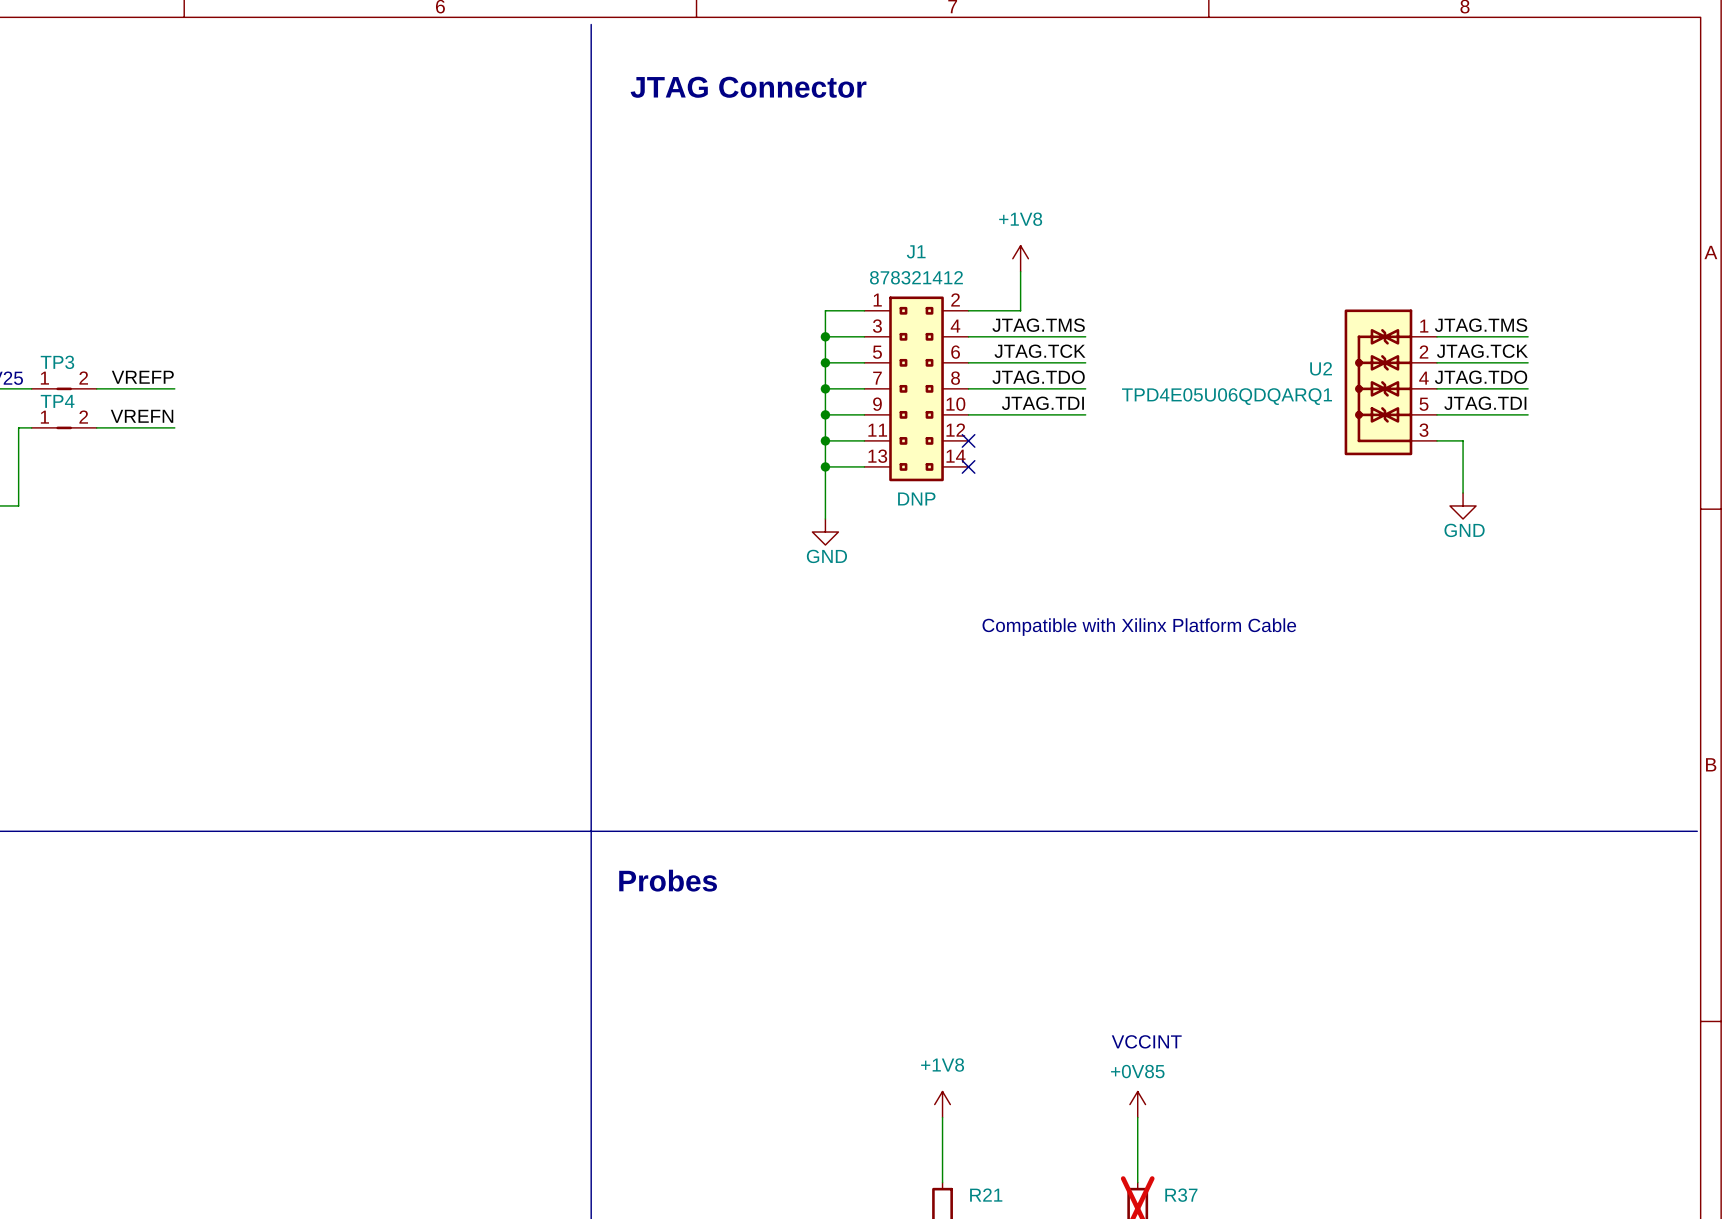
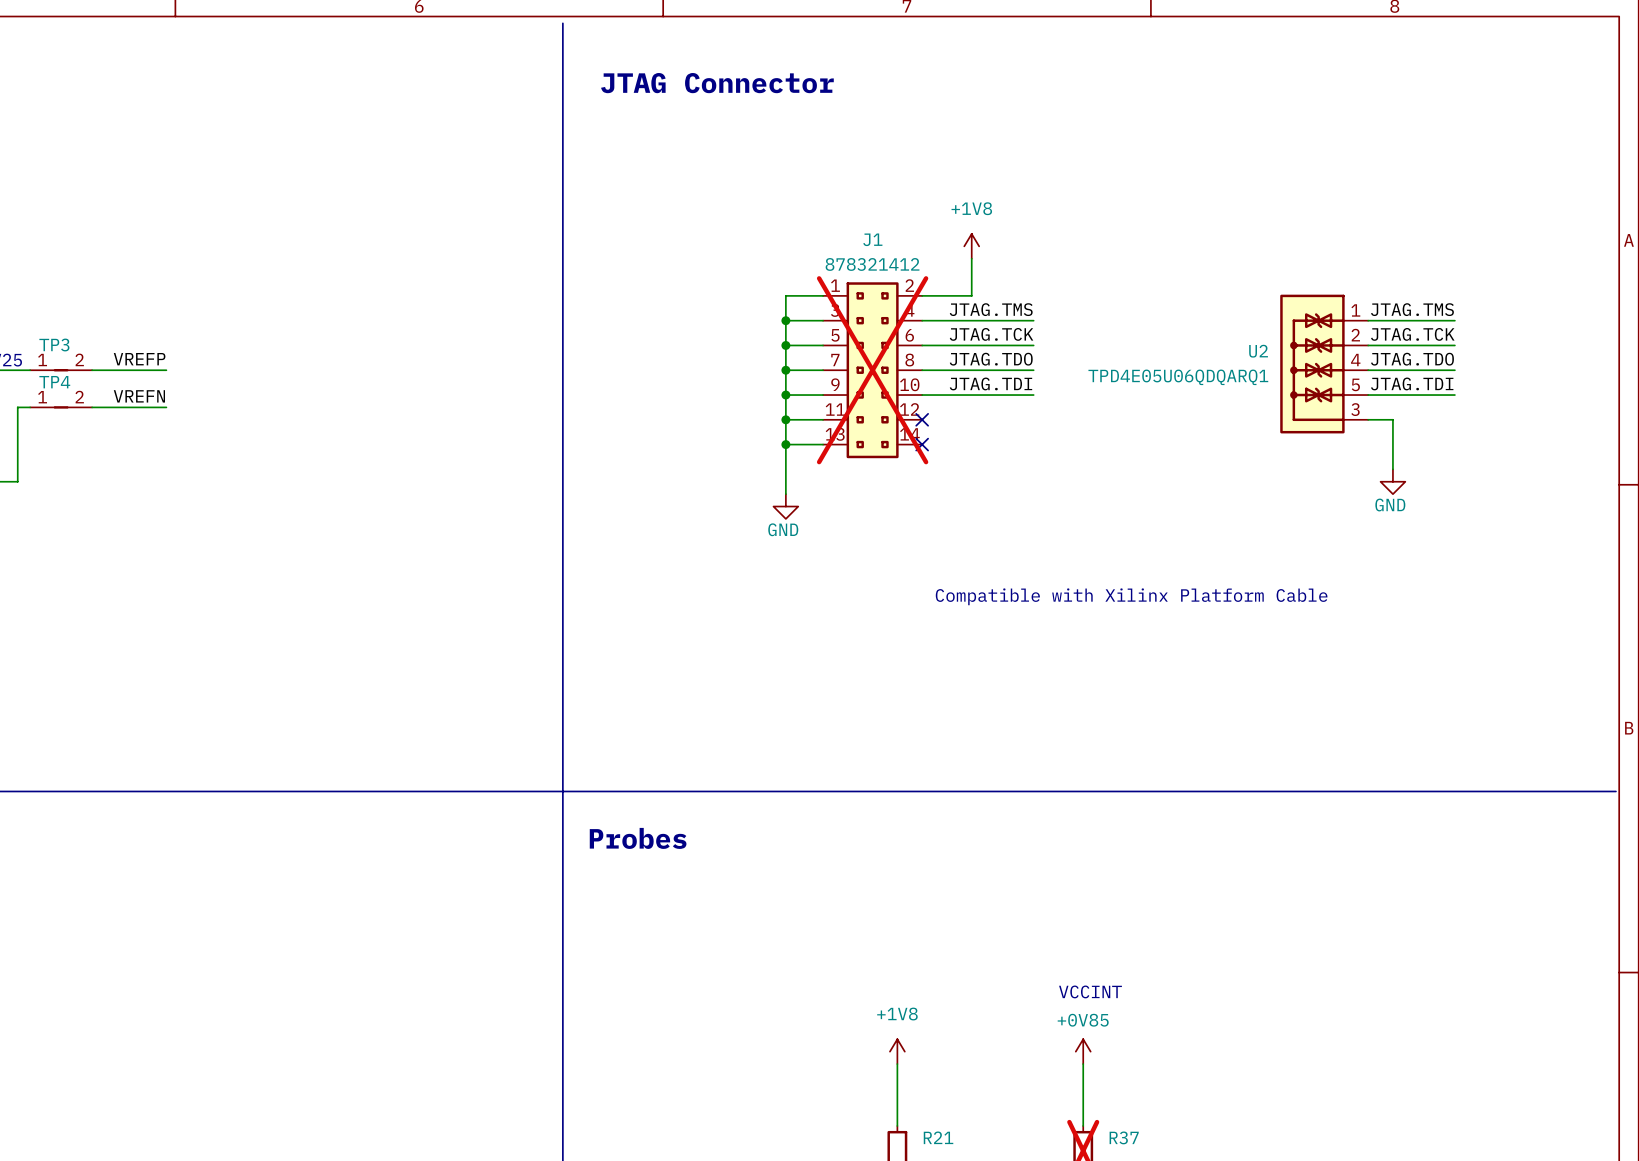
J1 do-not-place cross: none -> (872, 370)
J1 text: DNP (916, 498) -> none

